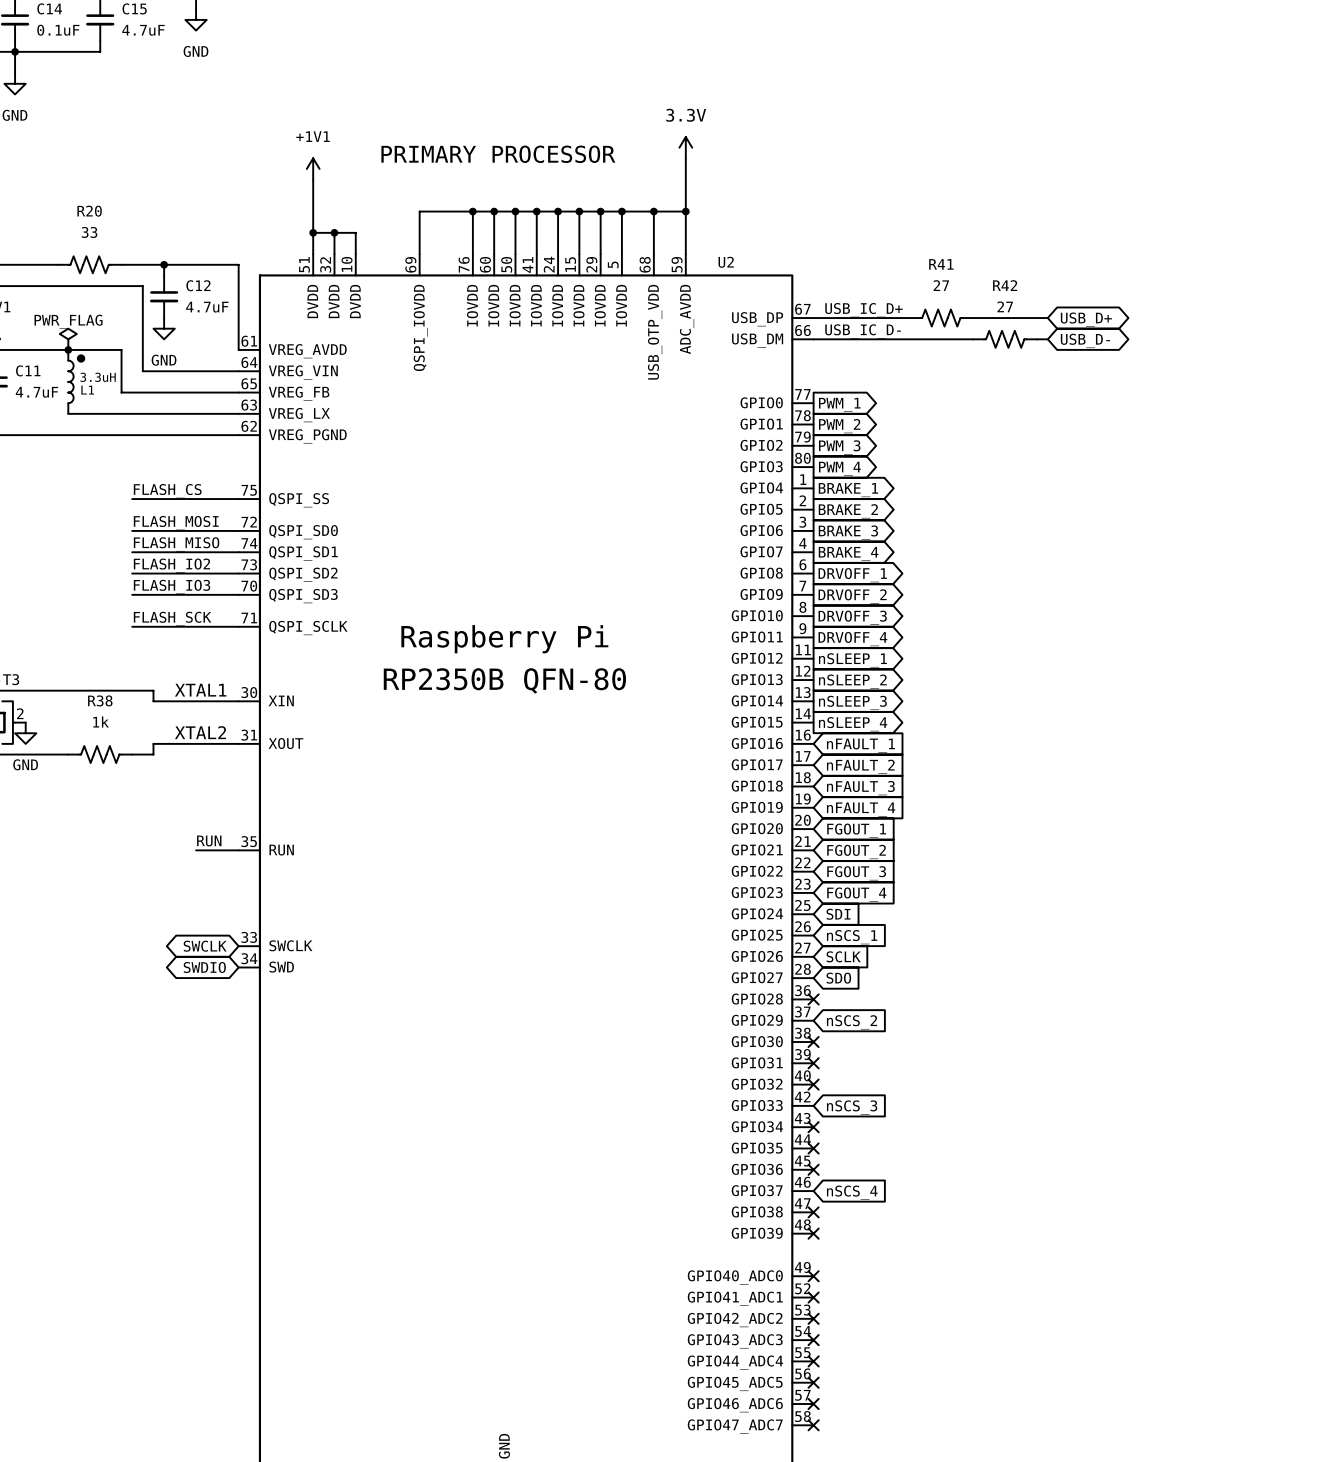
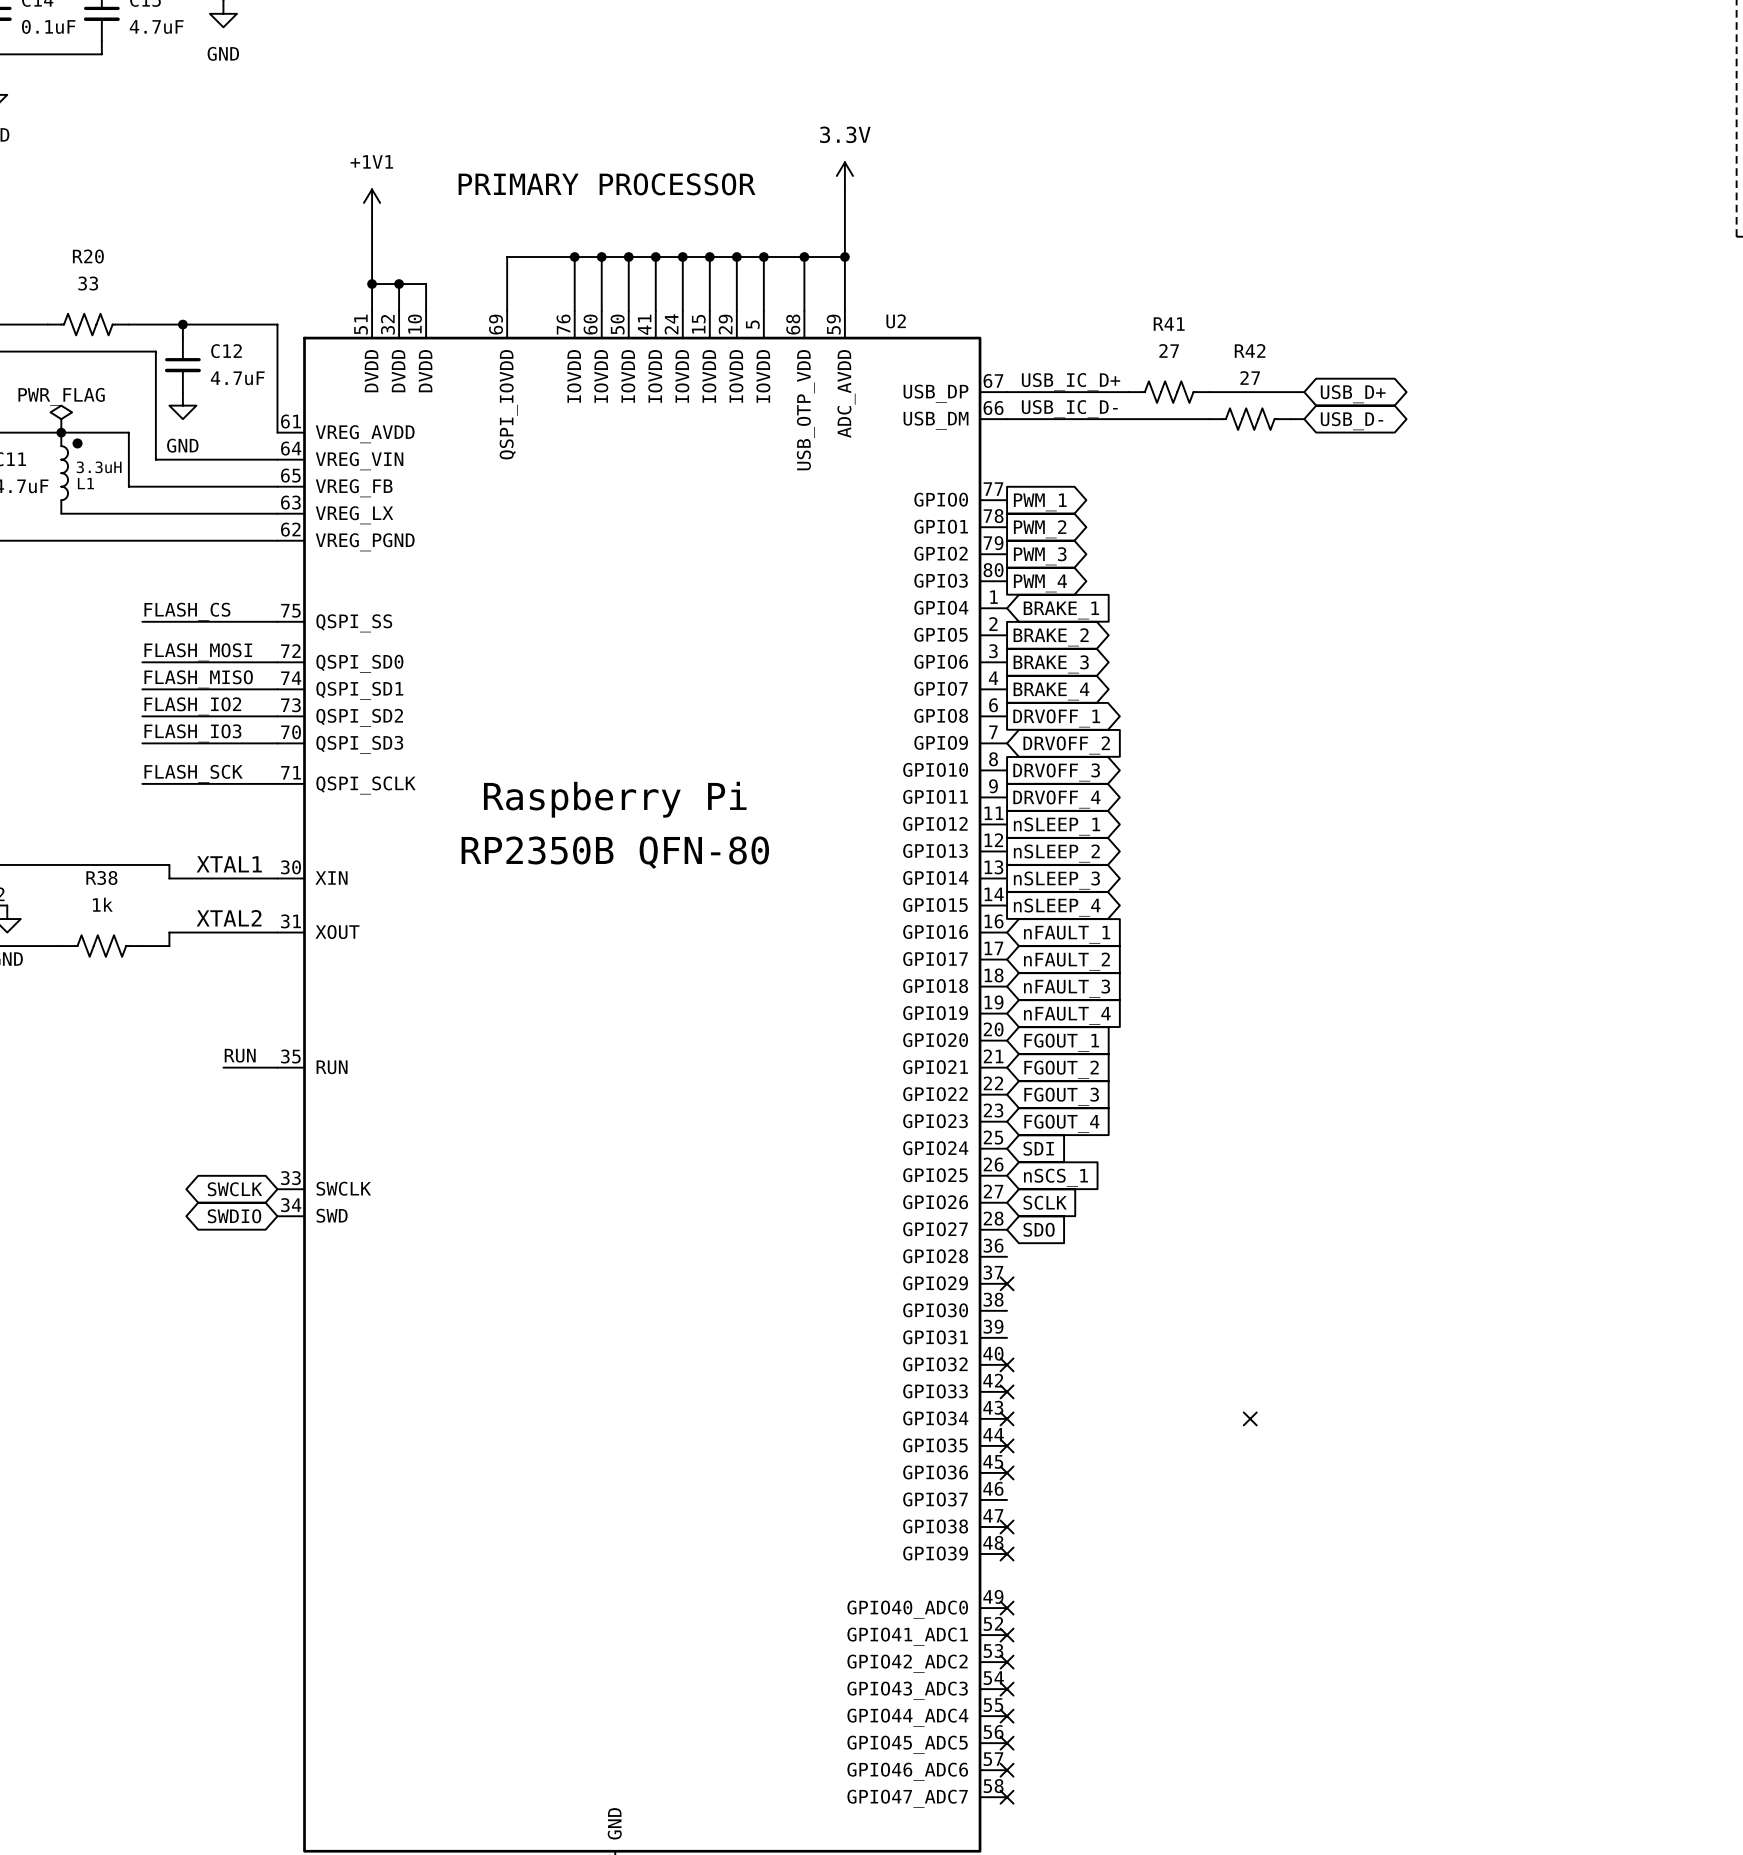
global label shape: output (848, 490) -> input (1061, 610)
global label shape: output (852, 596) -> input (1066, 745)
no-connect mark: (813, 999) -> none
no-connect mark: none -> (1007, 1283)
global label: nSCS_2 (852, 1022) -> none
no-connect mark: (813, 1042) -> none
no-connect mark: (813, 1063) -> none
no-connect mark: none -> (1007, 1391)
global label: nSCS_3 (852, 1107) -> none
no-connect mark: none -> (1250, 1418)
global label: nSCS_4 (852, 1192) -> none

